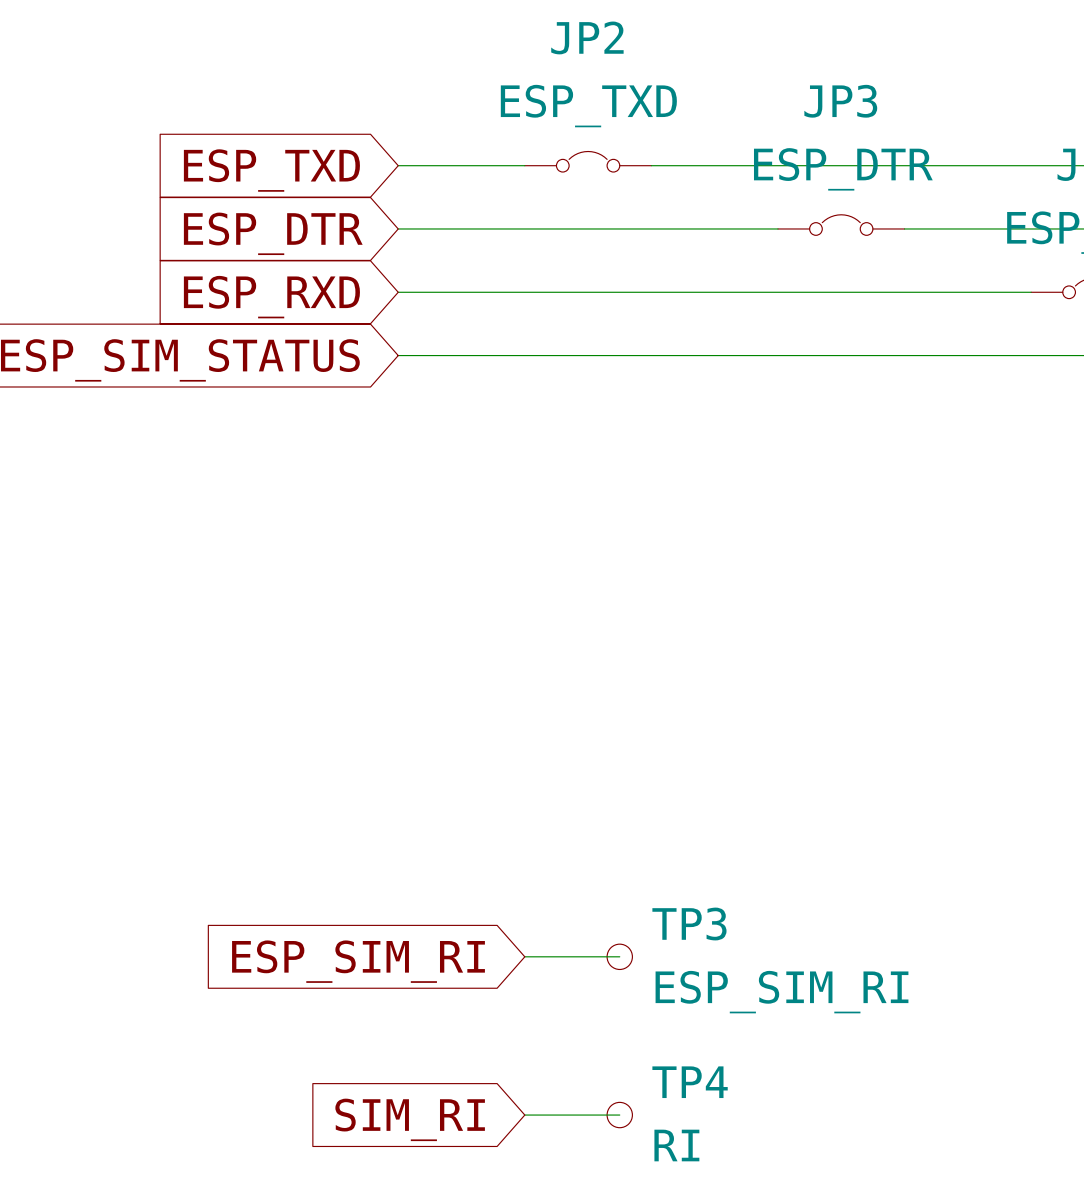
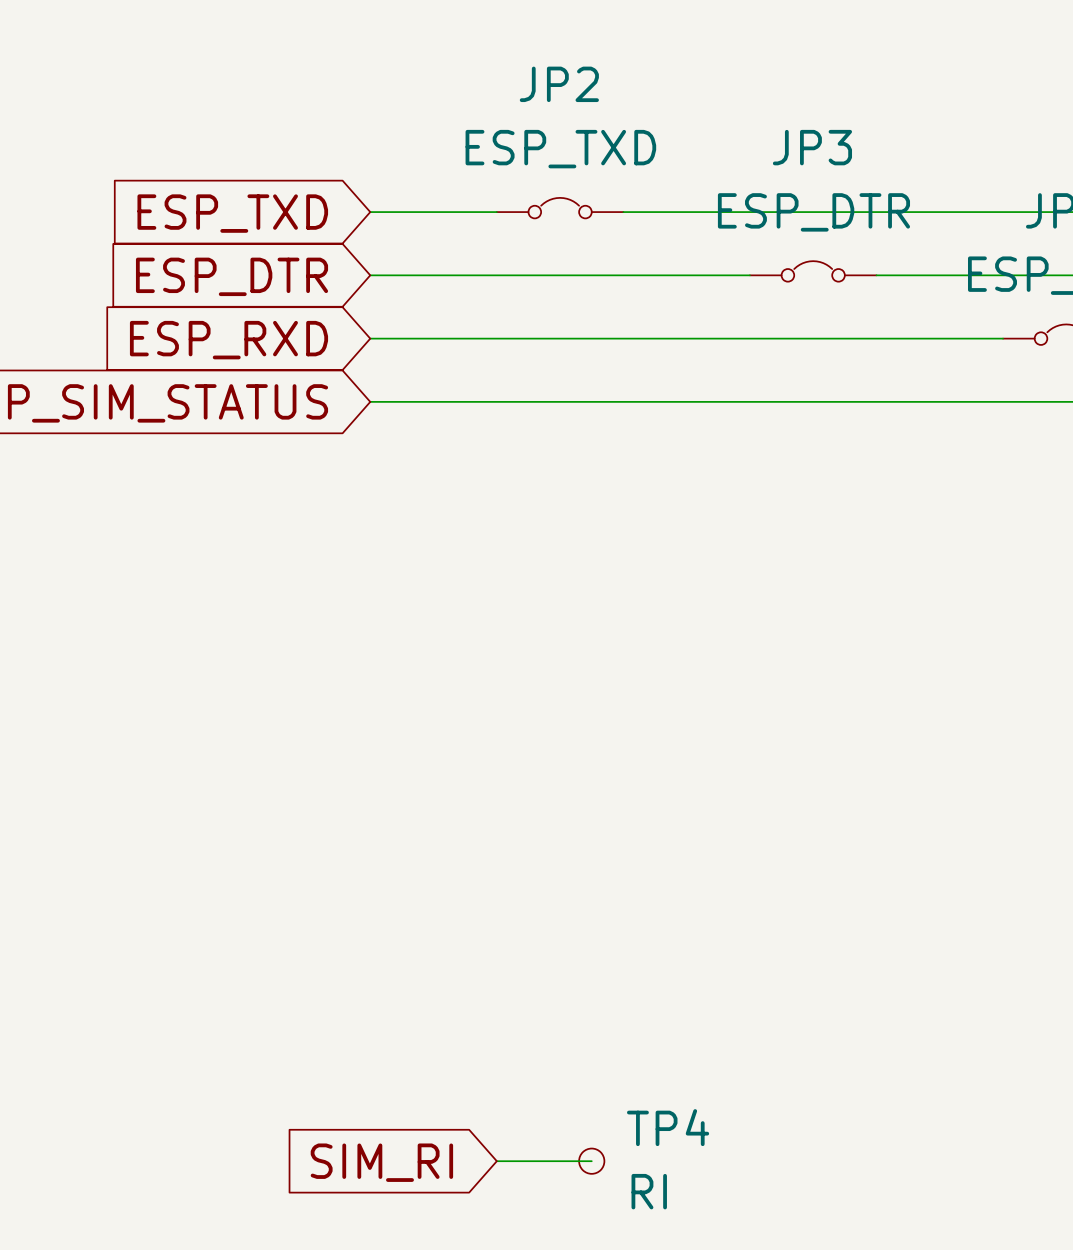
wire: (524, 956) (619, 956) -> none
TP3: ESP_SIM_RI (619, 956) -> none
global label: ESP_SIM_RI (358, 961) -> none

